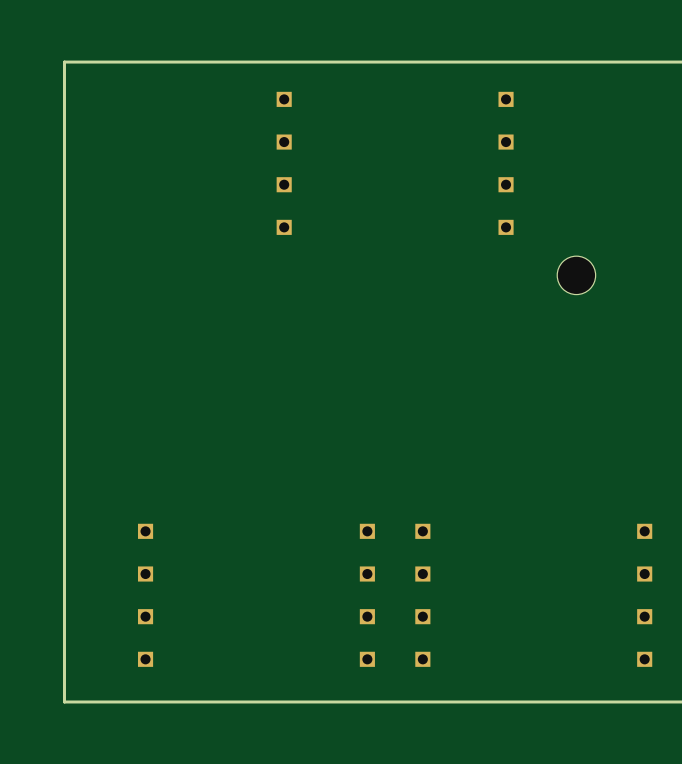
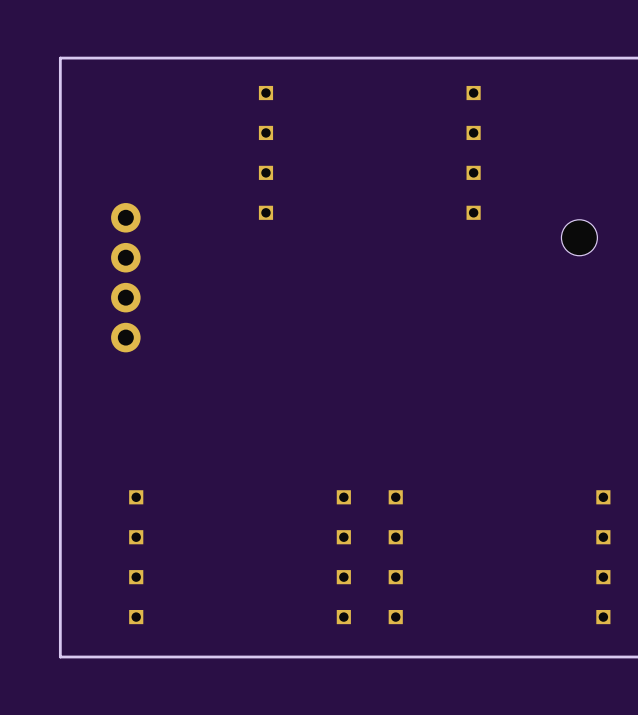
hole position: (576, 275) -> (579, 237)
part: none -> (125, 277)

